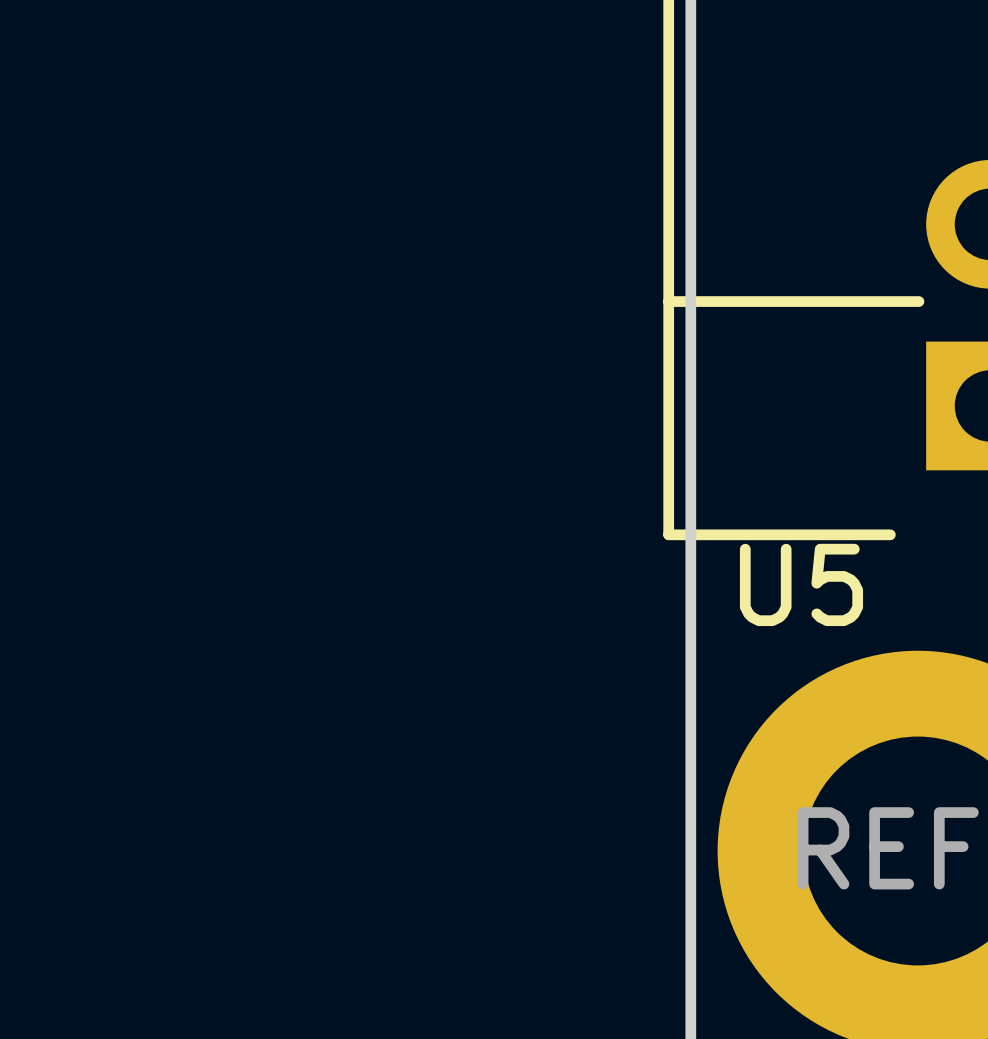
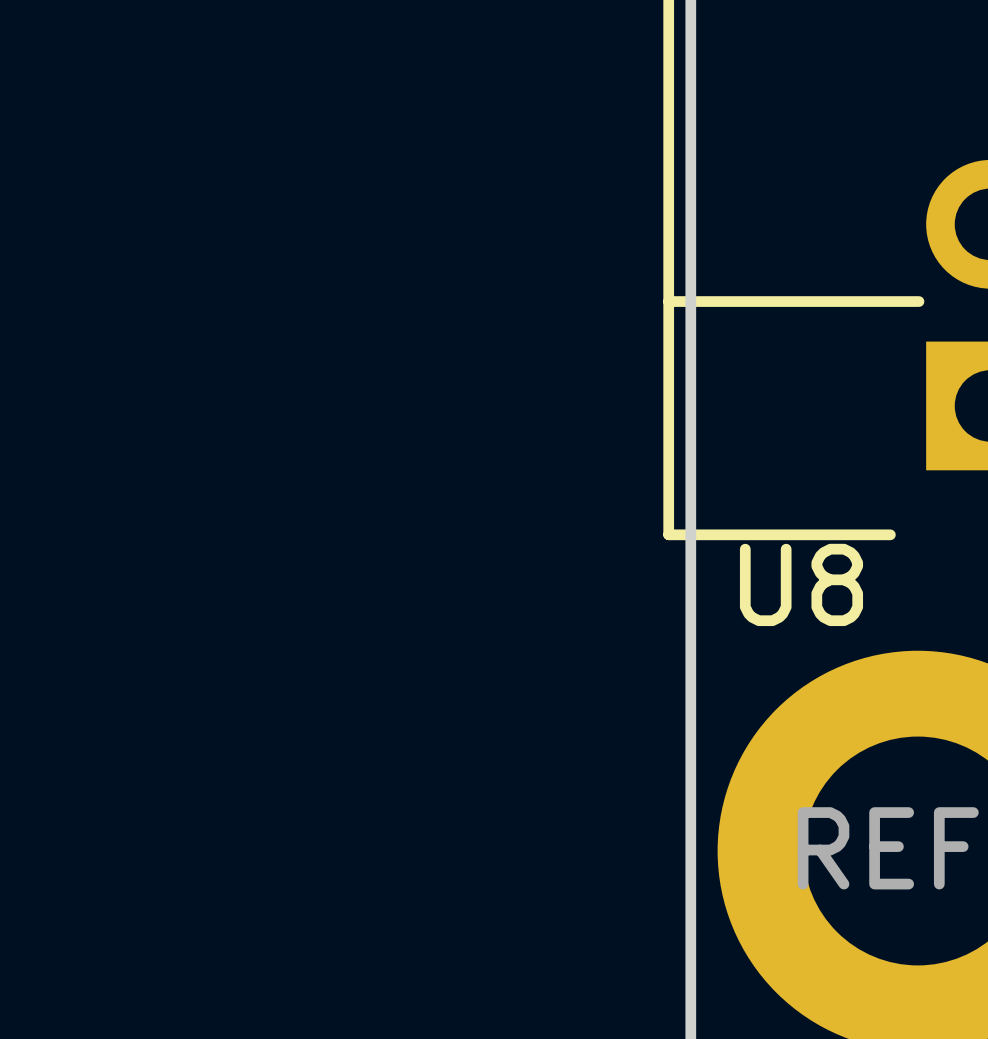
U5 name: U5 (801, 584) -> U8 (801, 584)

